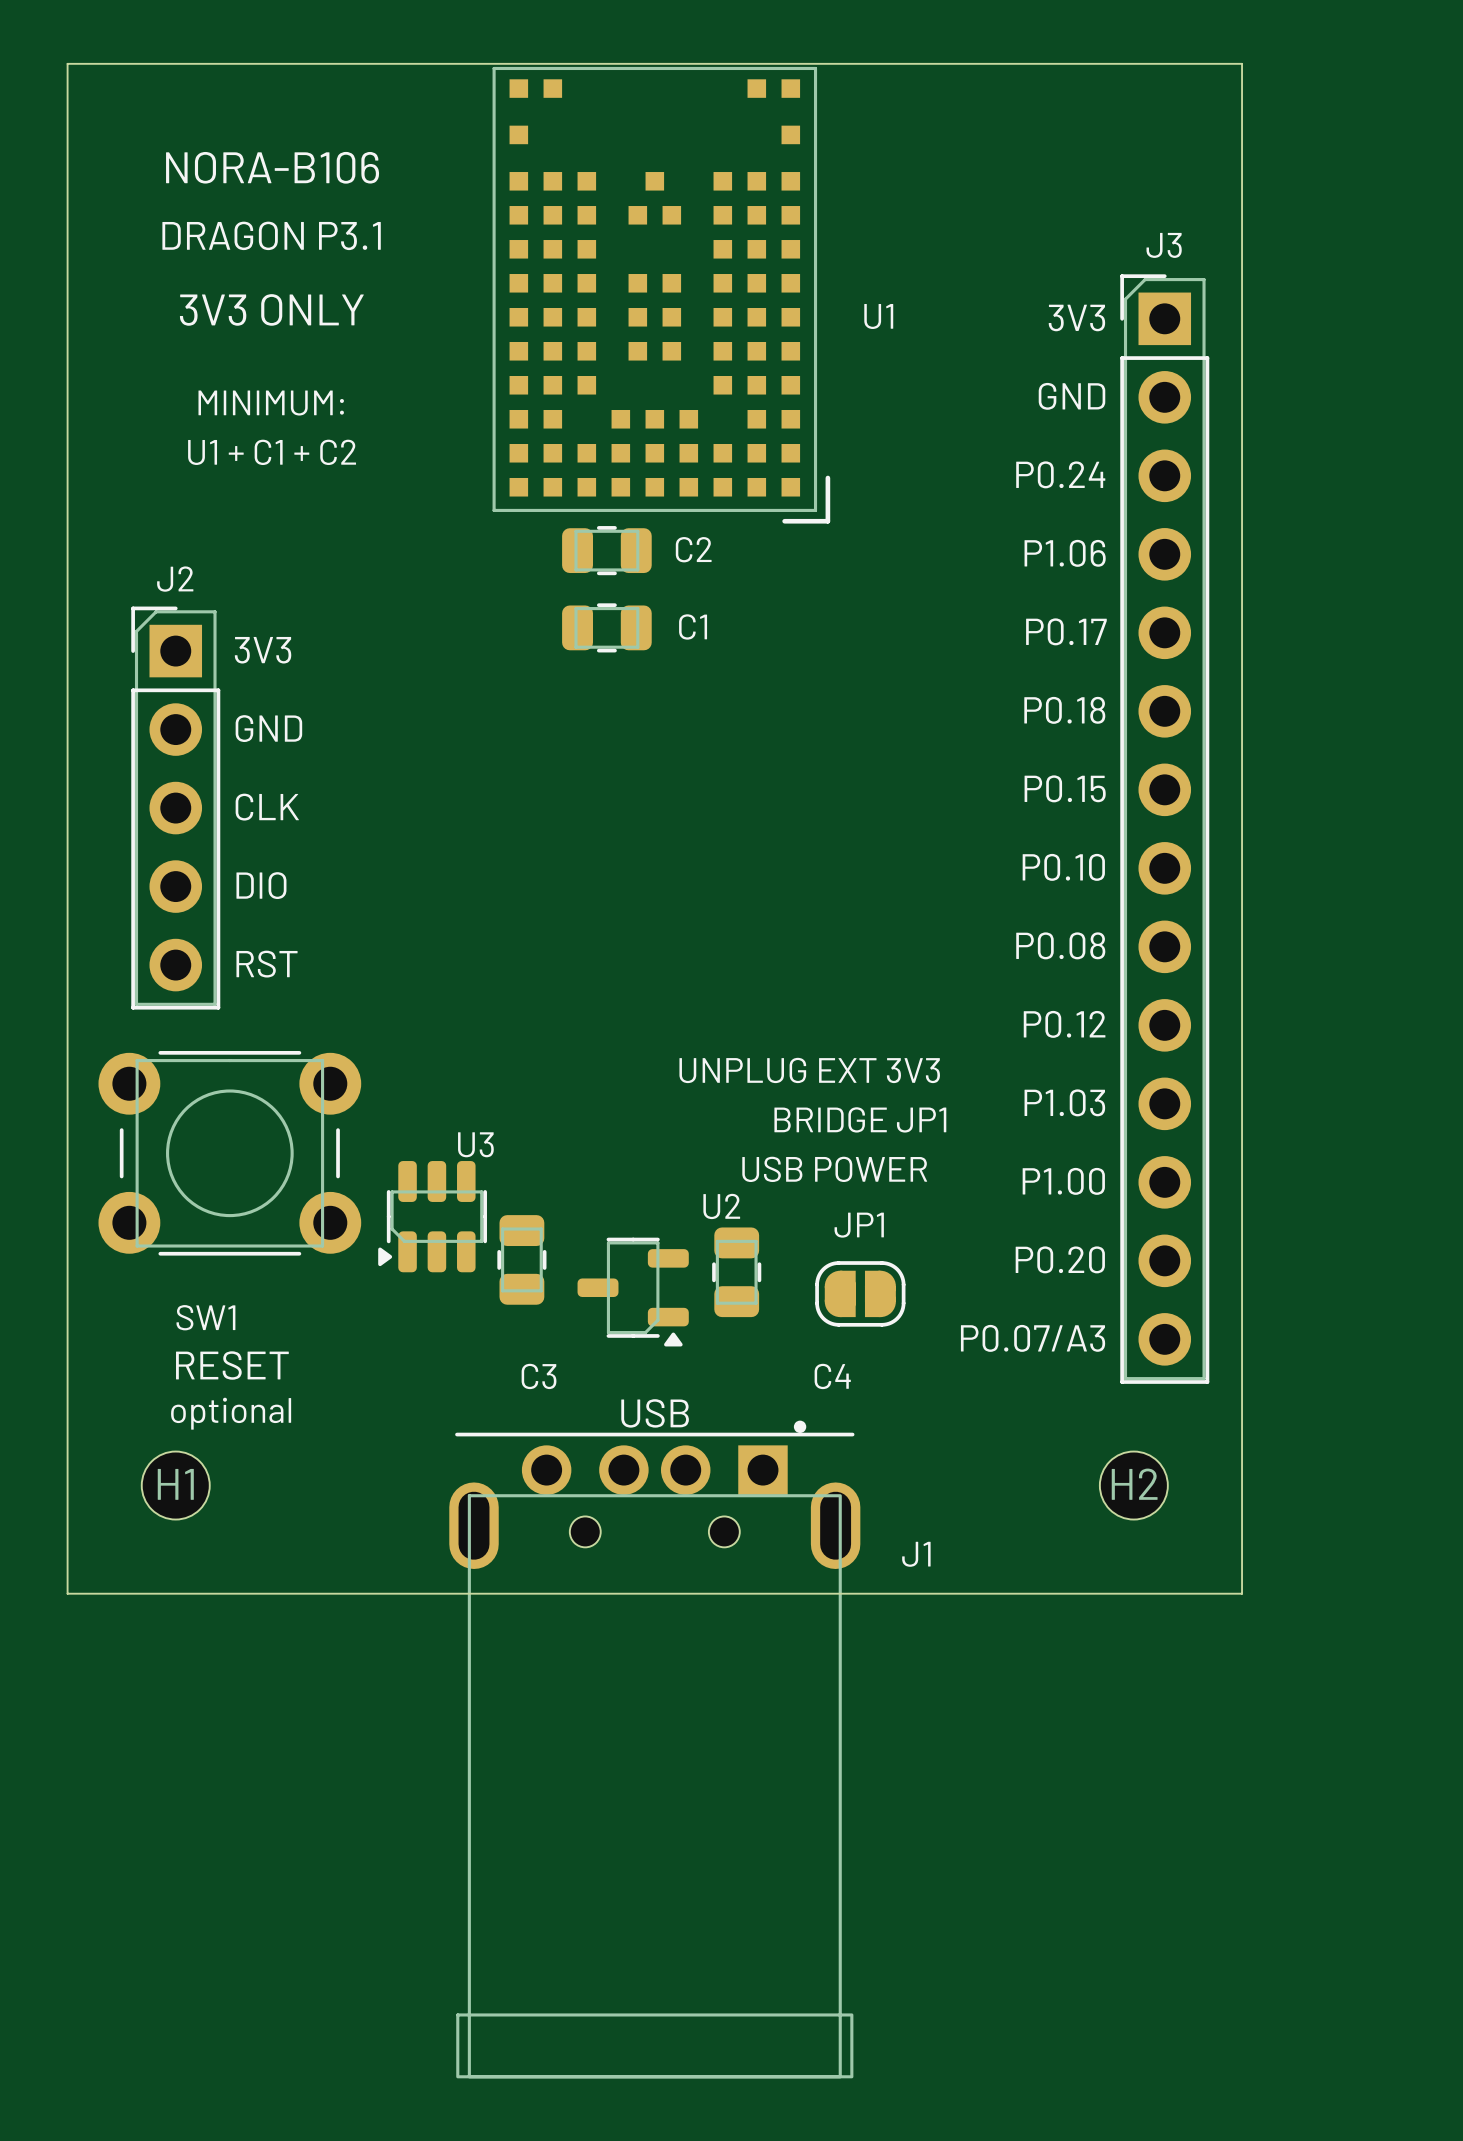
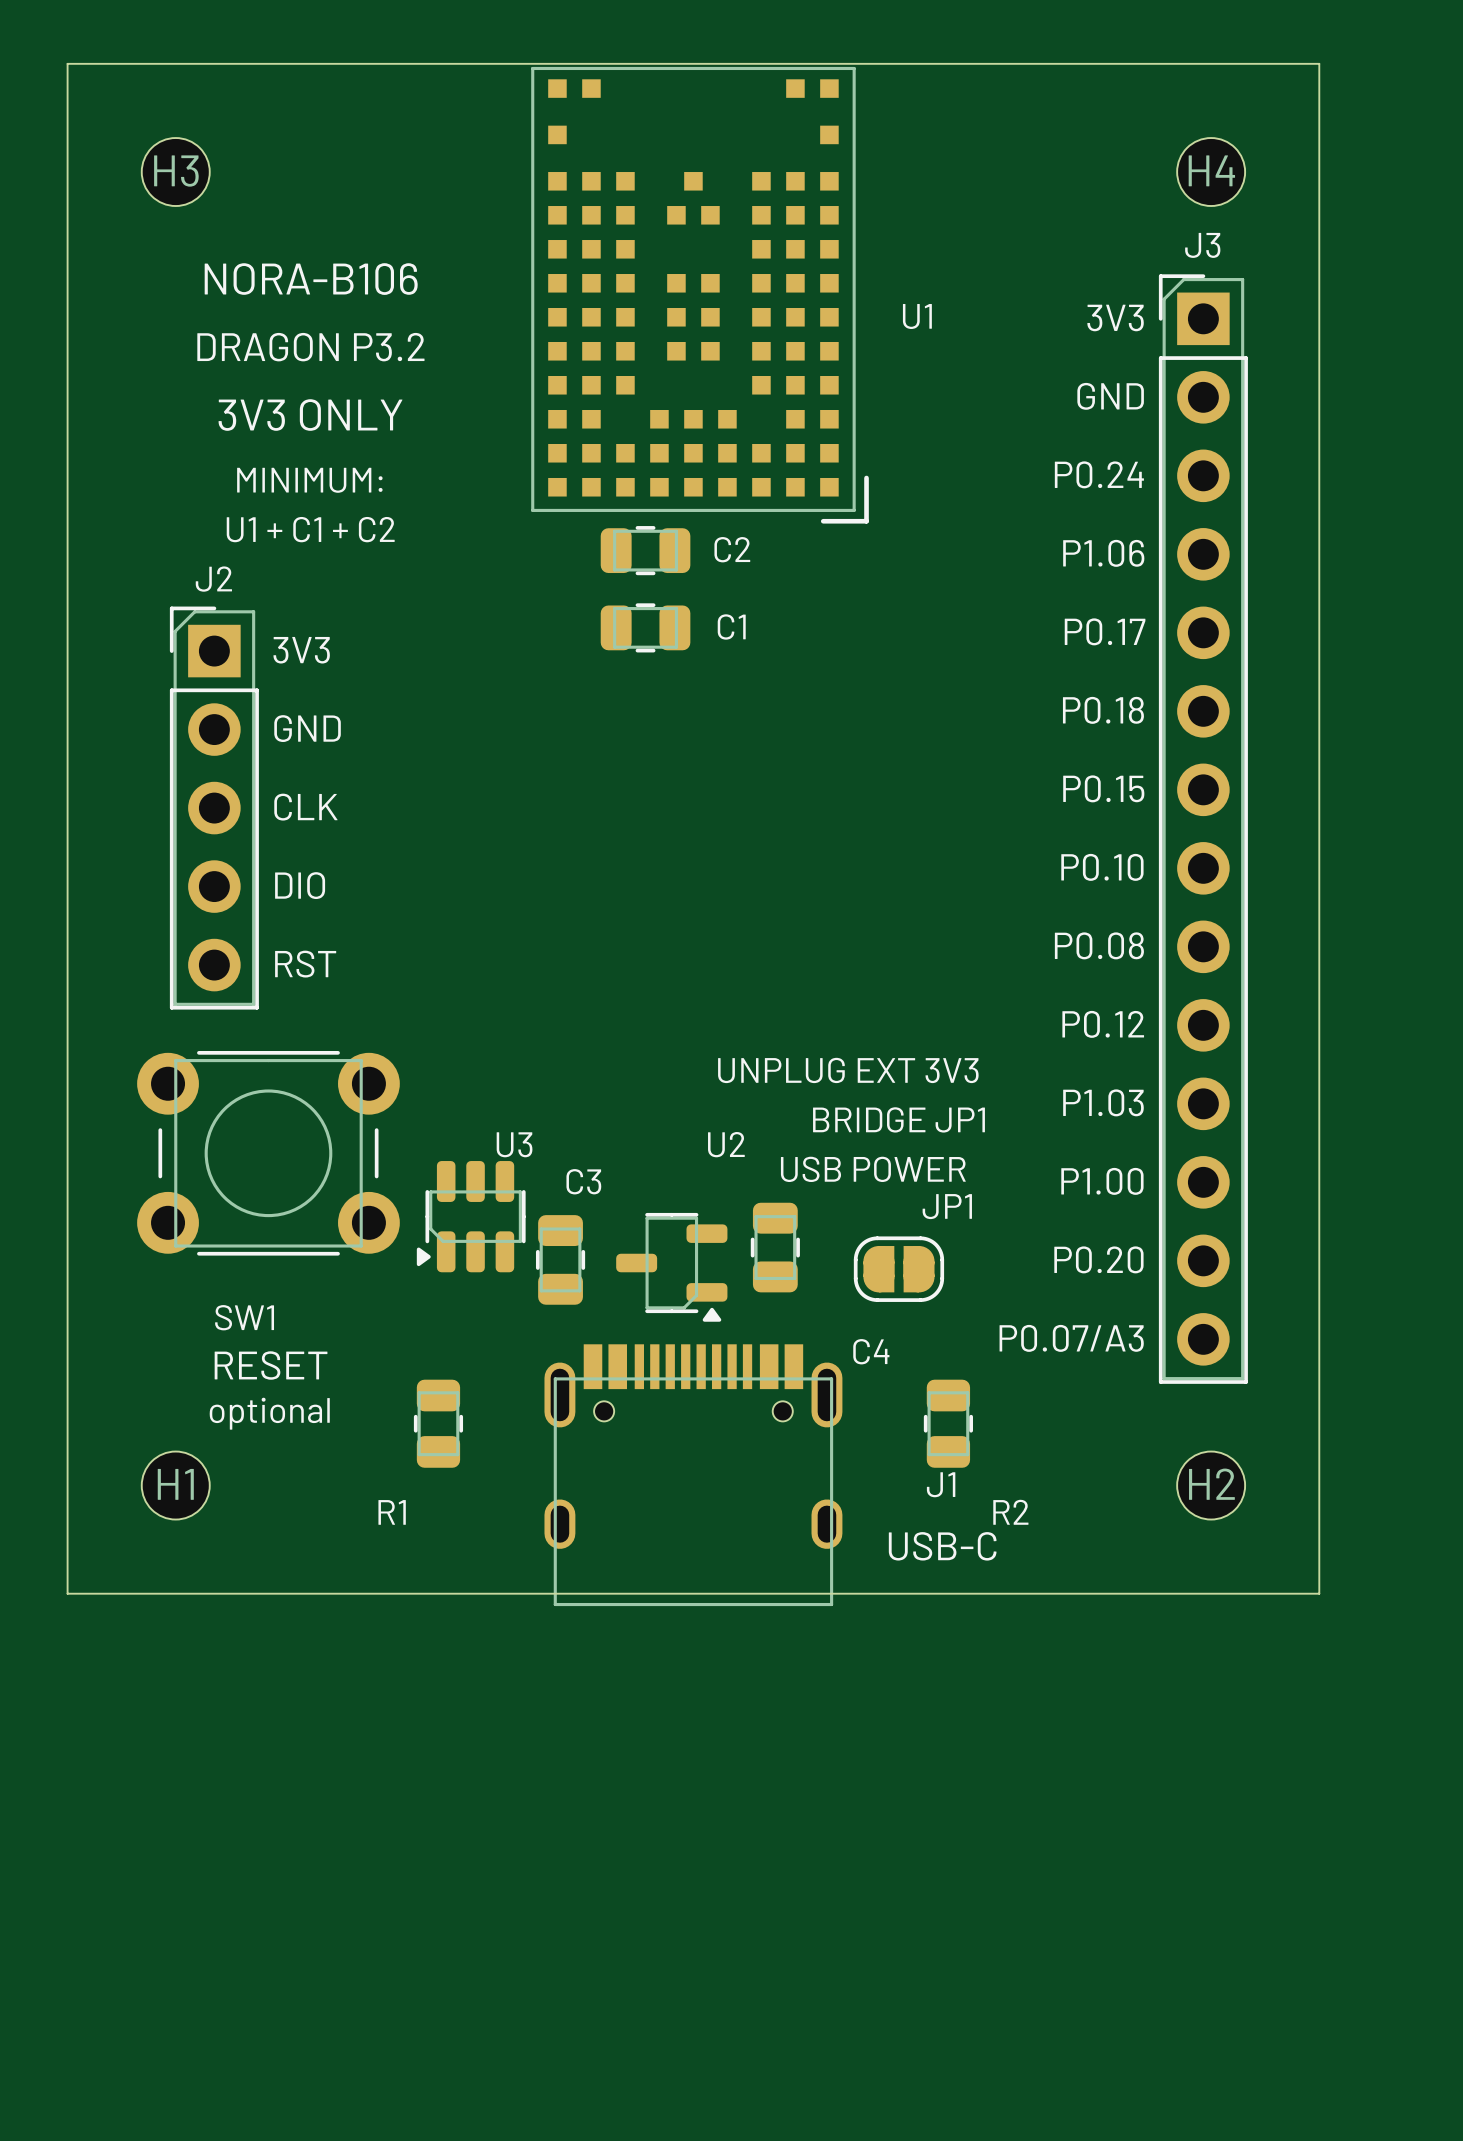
board edge: (1242, 63) (1242, 1593) -> (1242, 63) (1319, 63) (1319, 1593) (1242, 1593)
text position: NORA-B106 (272, 167) -> NORA-B106 (311, 279)
H3: none -> (175, 172)
H4: none -> (1211, 172)
text: DRAGON P3.1 (271, 235) -> none
U1 position: (661, 295) -> (700, 295)
text position: 3V3 ONLY (271, 309) -> 3V3 ONLY (310, 415)
text position: 3V3 (1076, 317) -> 3V3 (1115, 317)
text: none -> DRAGON P3.2 (310, 347)
text position: GND (1071, 396) -> GND (1110, 396)
text position: MINIMUM: (271, 403) -> MINIMUM: (309, 480)
text position: U1 + C1 + C2 (272, 452) -> U1 + C1 + C2 (310, 529)
text position: P0.24 (1060, 474) -> P0.24 (1099, 474)
C2 position: (606, 550) -> (645, 550)
text position: P1.06 (1065, 553) -> P1.06 (1103, 553)
C1 position: (606, 627) -> (645, 627)
text position: P0.17 (1066, 631) -> P0.17 (1105, 631)
text position: 3V3 (263, 650) -> 3V3 (301, 650)
text position: P0.18 (1064, 710) -> P0.18 (1103, 710)
text position: GND (268, 728) -> GND (307, 728)
text position: P0.15 (1065, 788) -> P0.15 (1103, 788)
text position: CLK (267, 807) -> CLK (305, 807)
J2 position: (175, 808) -> (214, 808)
J3 position: (1164, 829) -> (1203, 829)
text position: P0.10 (1063, 867) -> P0.10 (1102, 867)
text position: DIO (261, 885) -> DIO (300, 885)
text position: P0.08 (1060, 945) -> P0.08 (1099, 945)
text position: RST (267, 964) -> RST (305, 964)
text position: P0.12 (1064, 1024) -> P0.12 (1103, 1024)
text position: UNPLUG EXT 3V3 (809, 1070) -> UNPLUG EXT 3V3 (848, 1070)
text position: P1.03 (1064, 1102) -> P1.03 (1103, 1102)
text position: BRIDGE JP1 (860, 1119) -> BRIDGE JP1 (898, 1119)
SW1 position: (229, 1153) -> (268, 1153)
text position: USB POWER (834, 1169) -> USB POWER (873, 1169)
text position: P1.00 (1063, 1181) -> P1.00 (1102, 1181)
U2 name position: U2 (721, 1206) -> U2 (726, 1144)
U3 position: (432, 1216) -> (471, 1216)
JP1 name position: JP1 (859, 1225) -> JP1 (947, 1206)
C3 position: (521, 1259) -> (560, 1259)
text position: P0.20 (1060, 1259) -> P0.20 (1098, 1259)
C4 position: (736, 1272) -> (775, 1247)
U2 position: (633, 1292) -> (671, 1267)
JP1 position: (860, 1293) -> (898, 1269)
text position: P0.07/A3 (1033, 1338) -> P0.07/A3 (1071, 1338)
text position: RESET (232, 1365) -> RESET (271, 1365)
C3 name position: C3 (539, 1376) -> C3 (583, 1181)
text position: optional (231, 1413) -> optional (269, 1413)
text: USB (655, 1413) -> none
J1 footprint: [449, 1420, 861, 2079] -> [544, 1344, 843, 1607]
R1: none -> (438, 1423)
R2: none -> (948, 1423)
H2 position: (1133, 1485) -> (1211, 1485)
text: none -> USB-C (942, 1546)
J1 name position: J1 (916, 1554) -> J1 (941, 1484)

